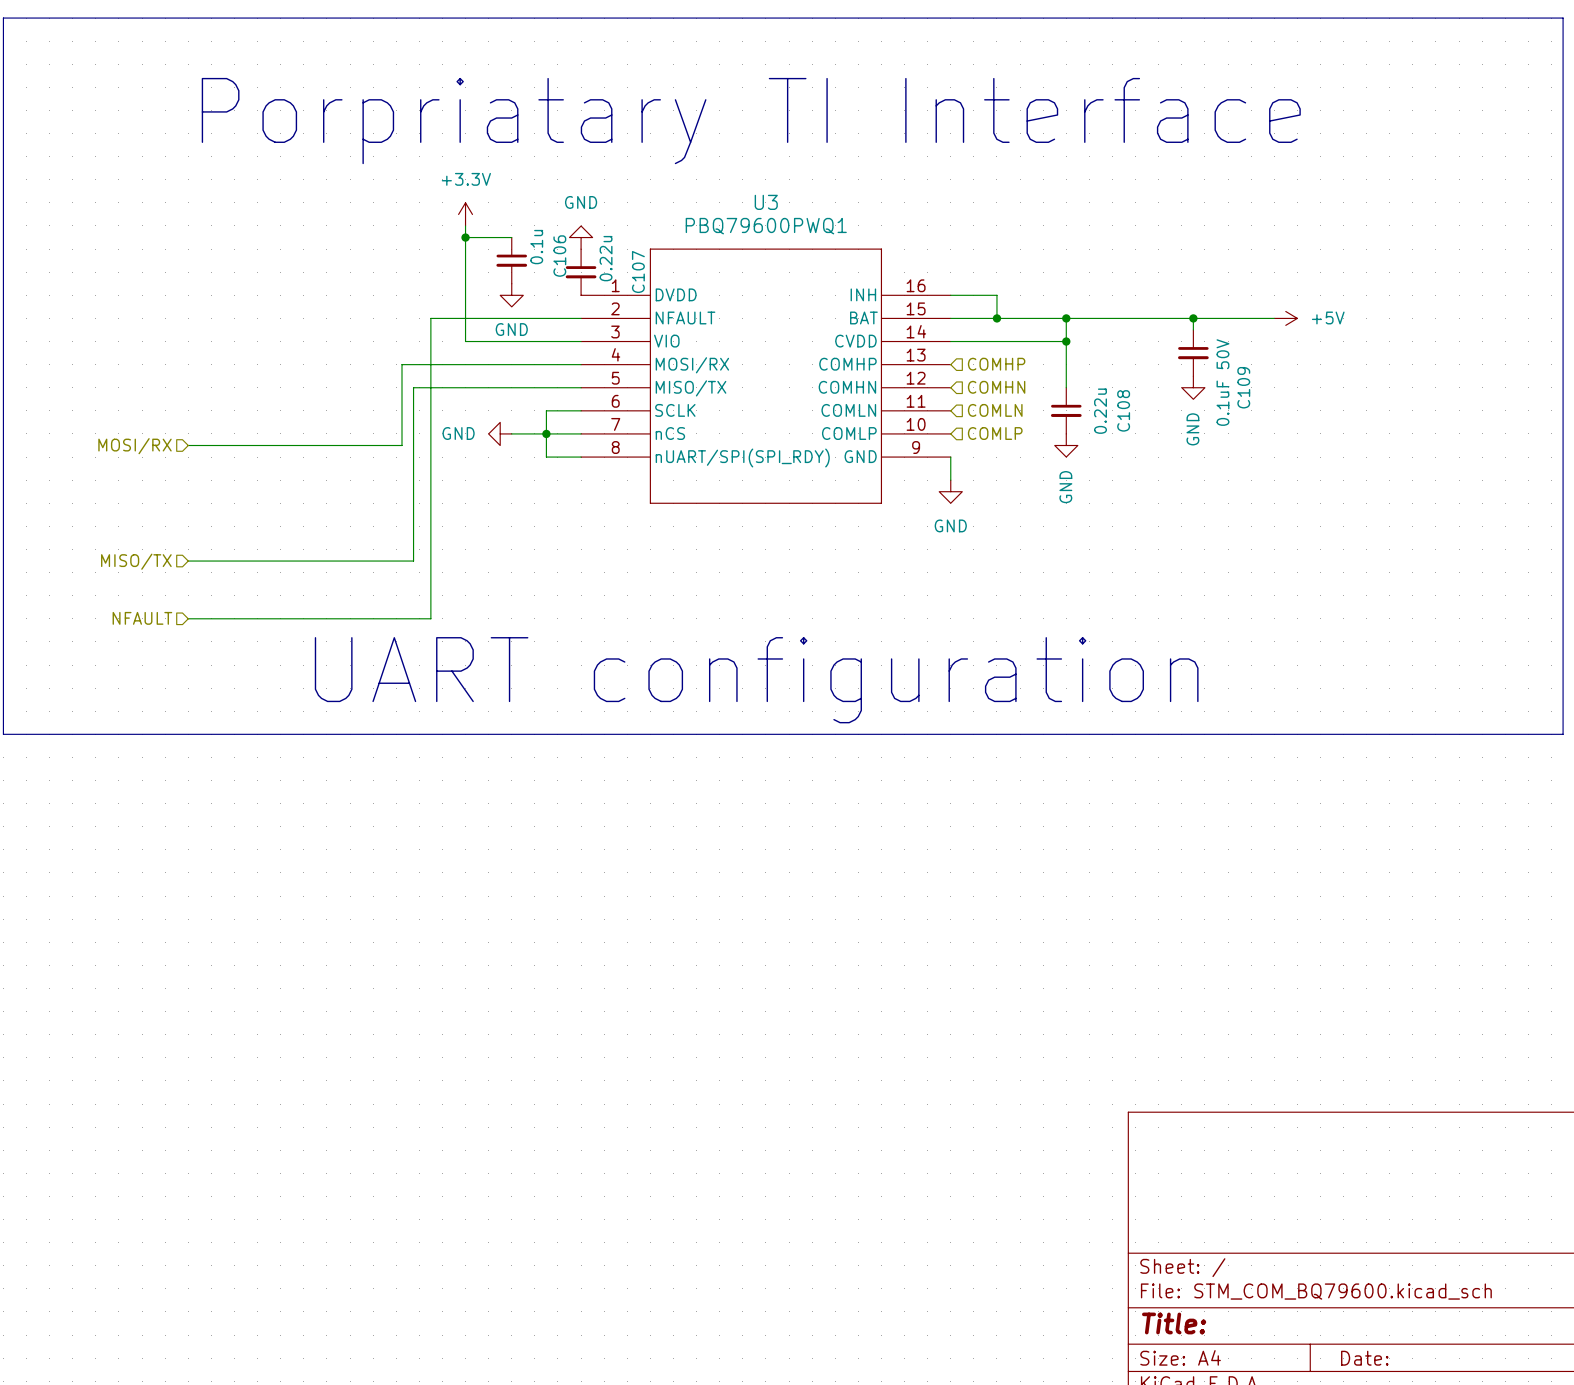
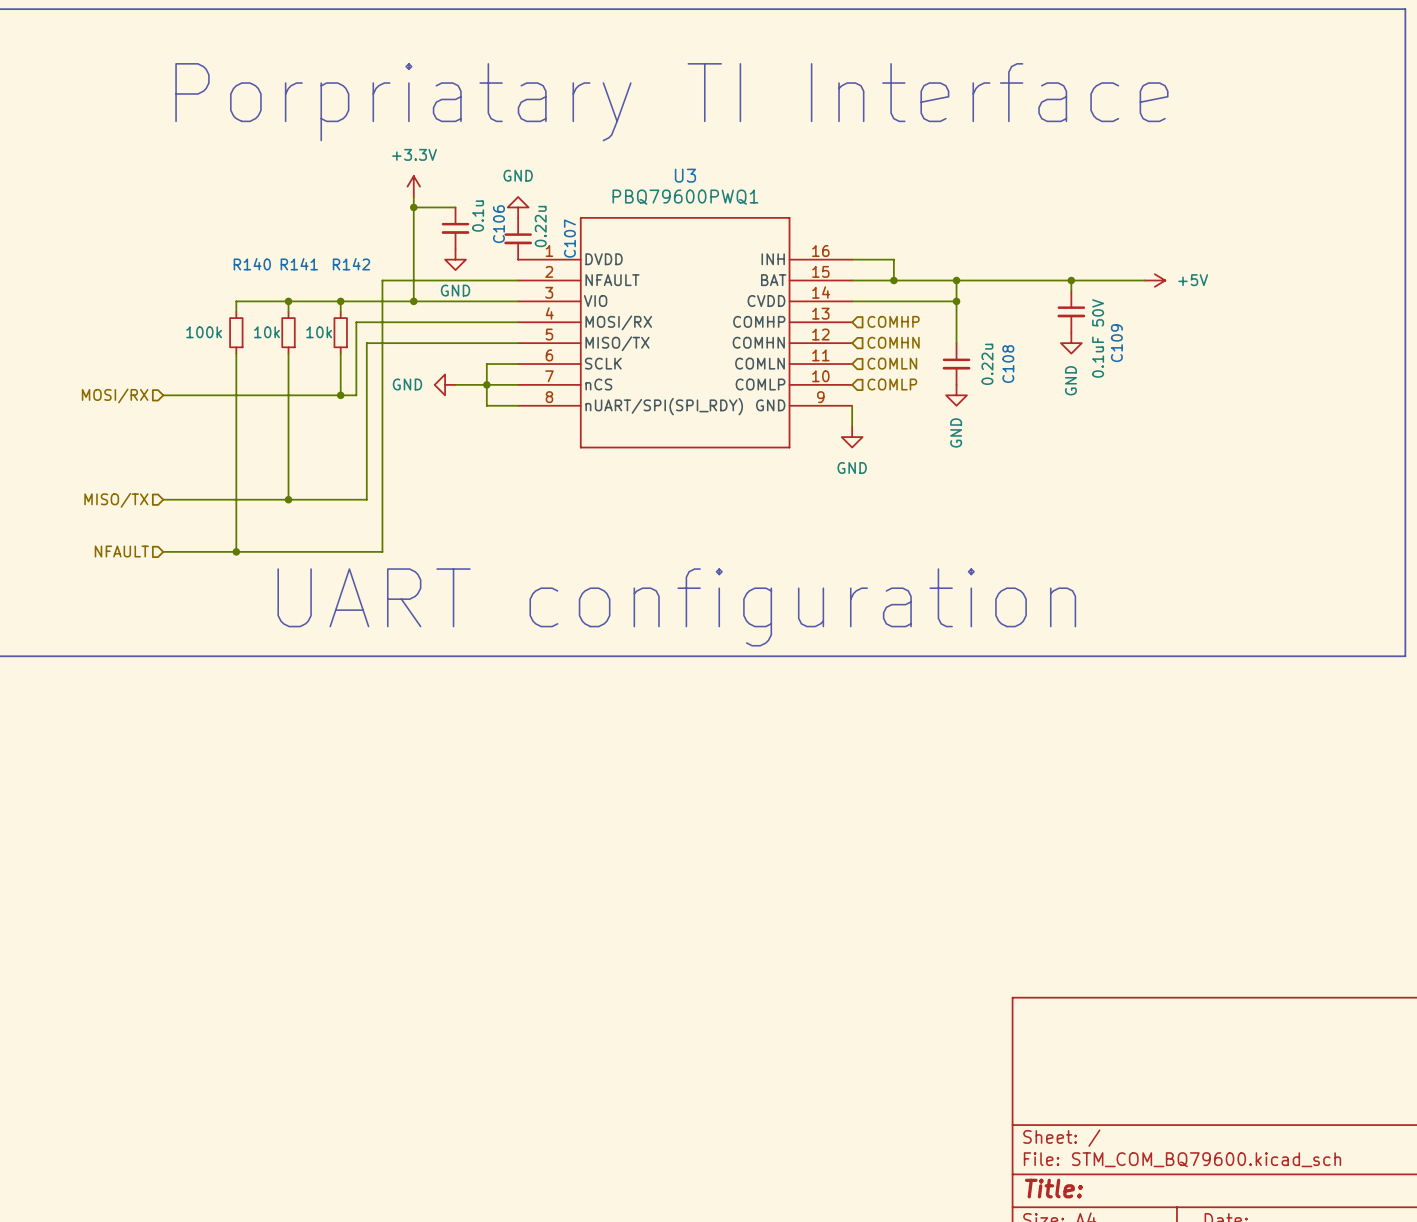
wire: none -> (288, 301) (288, 311)
junction: none -> (288, 301)
wire: none -> (340, 301) (340, 311)
junction: none -> (340, 301)
wire: none -> (413, 301) (236, 301) (236, 311)
junction: none -> (413, 301)
R140: none -> 100k (236, 332)
R141: none -> 10k (288, 332)
R142: none -> 10k (340, 332)
wire: none -> (236, 353) (236, 551)
wire: none -> (288, 353) (288, 499)
wire: none -> (340, 353) (340, 395)
junction: none -> (340, 395)
junction: none -> (288, 499)
junction: none -> (236, 551)

